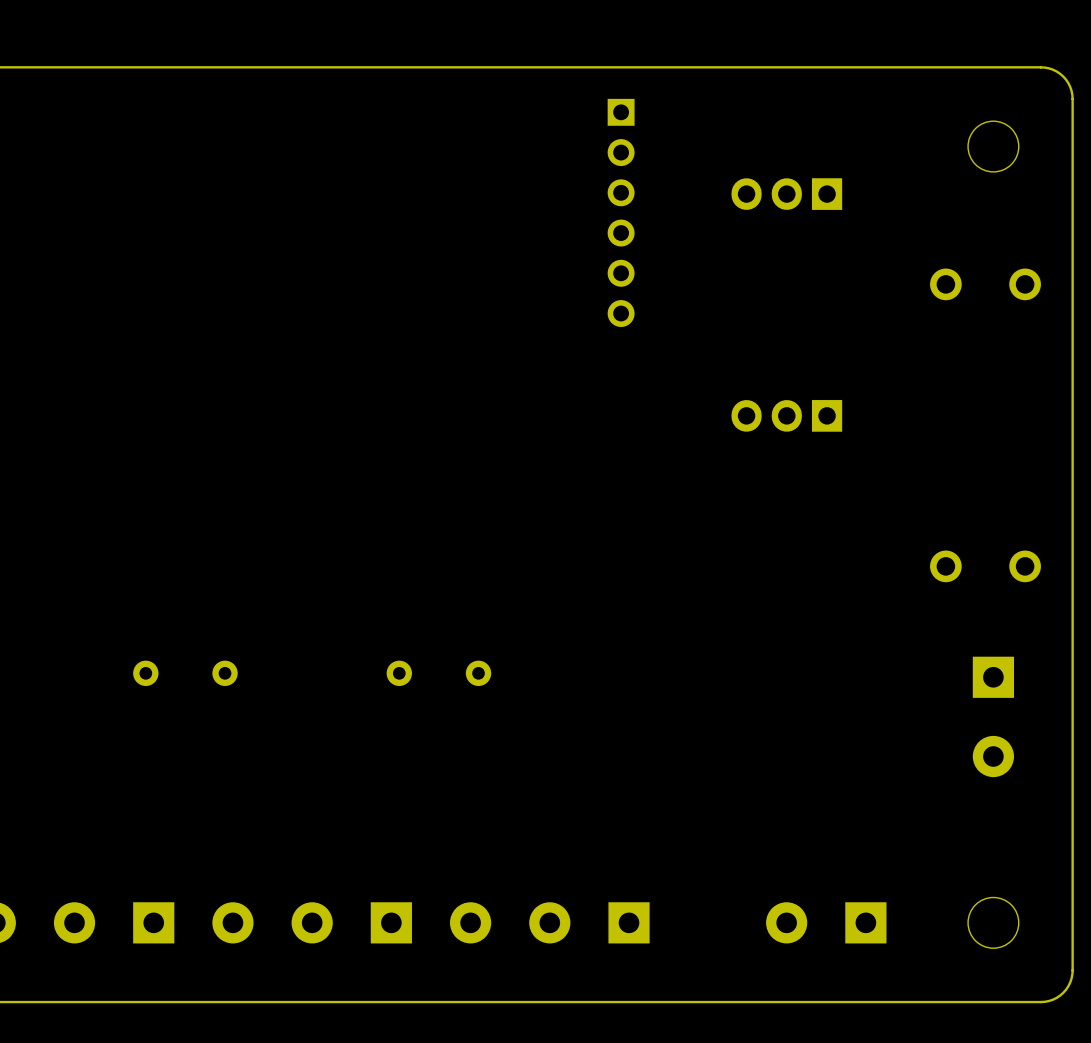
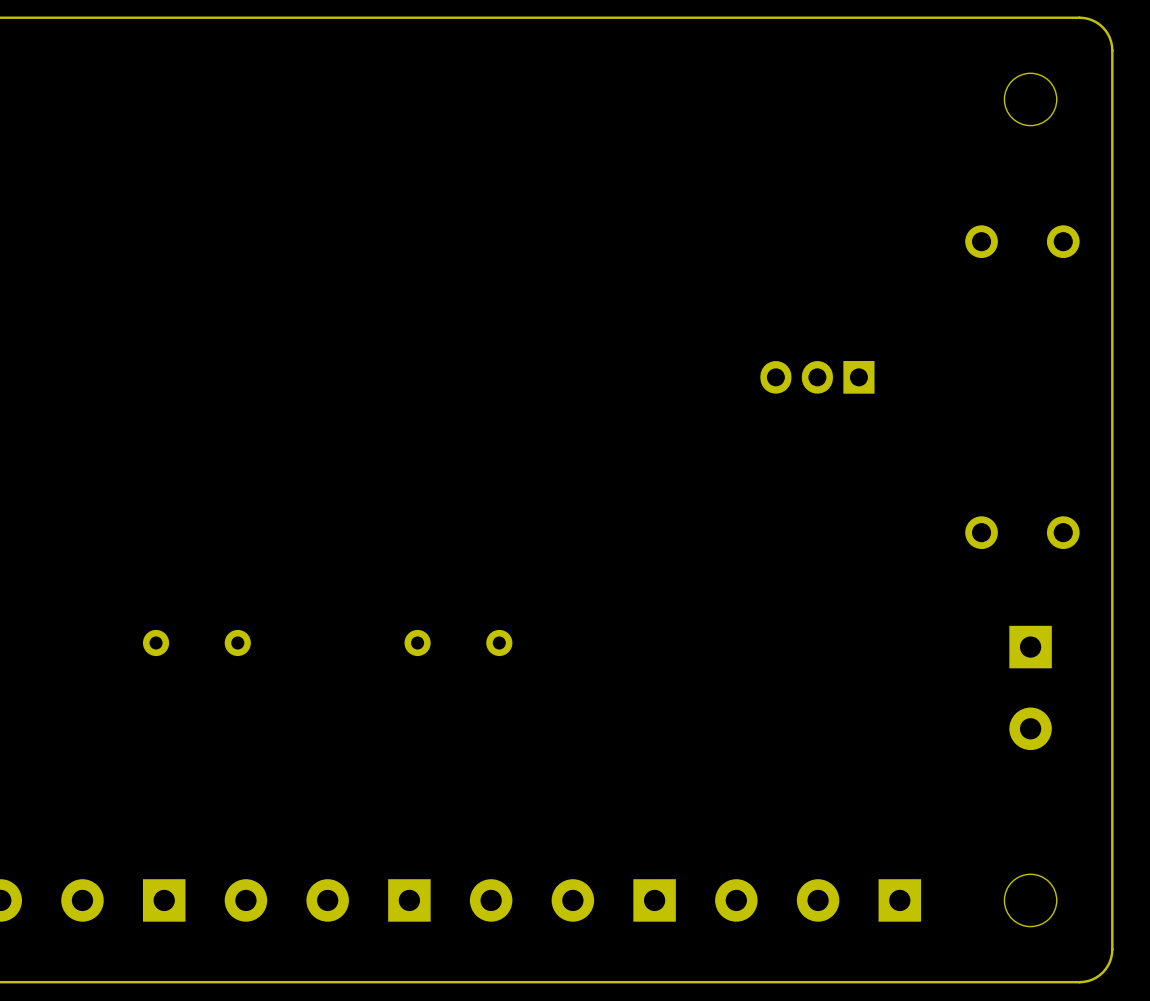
part: (786, 194) -> none
part: (621, 212) -> none
part: none -> (818, 900)
part: (826, 922) -> none

